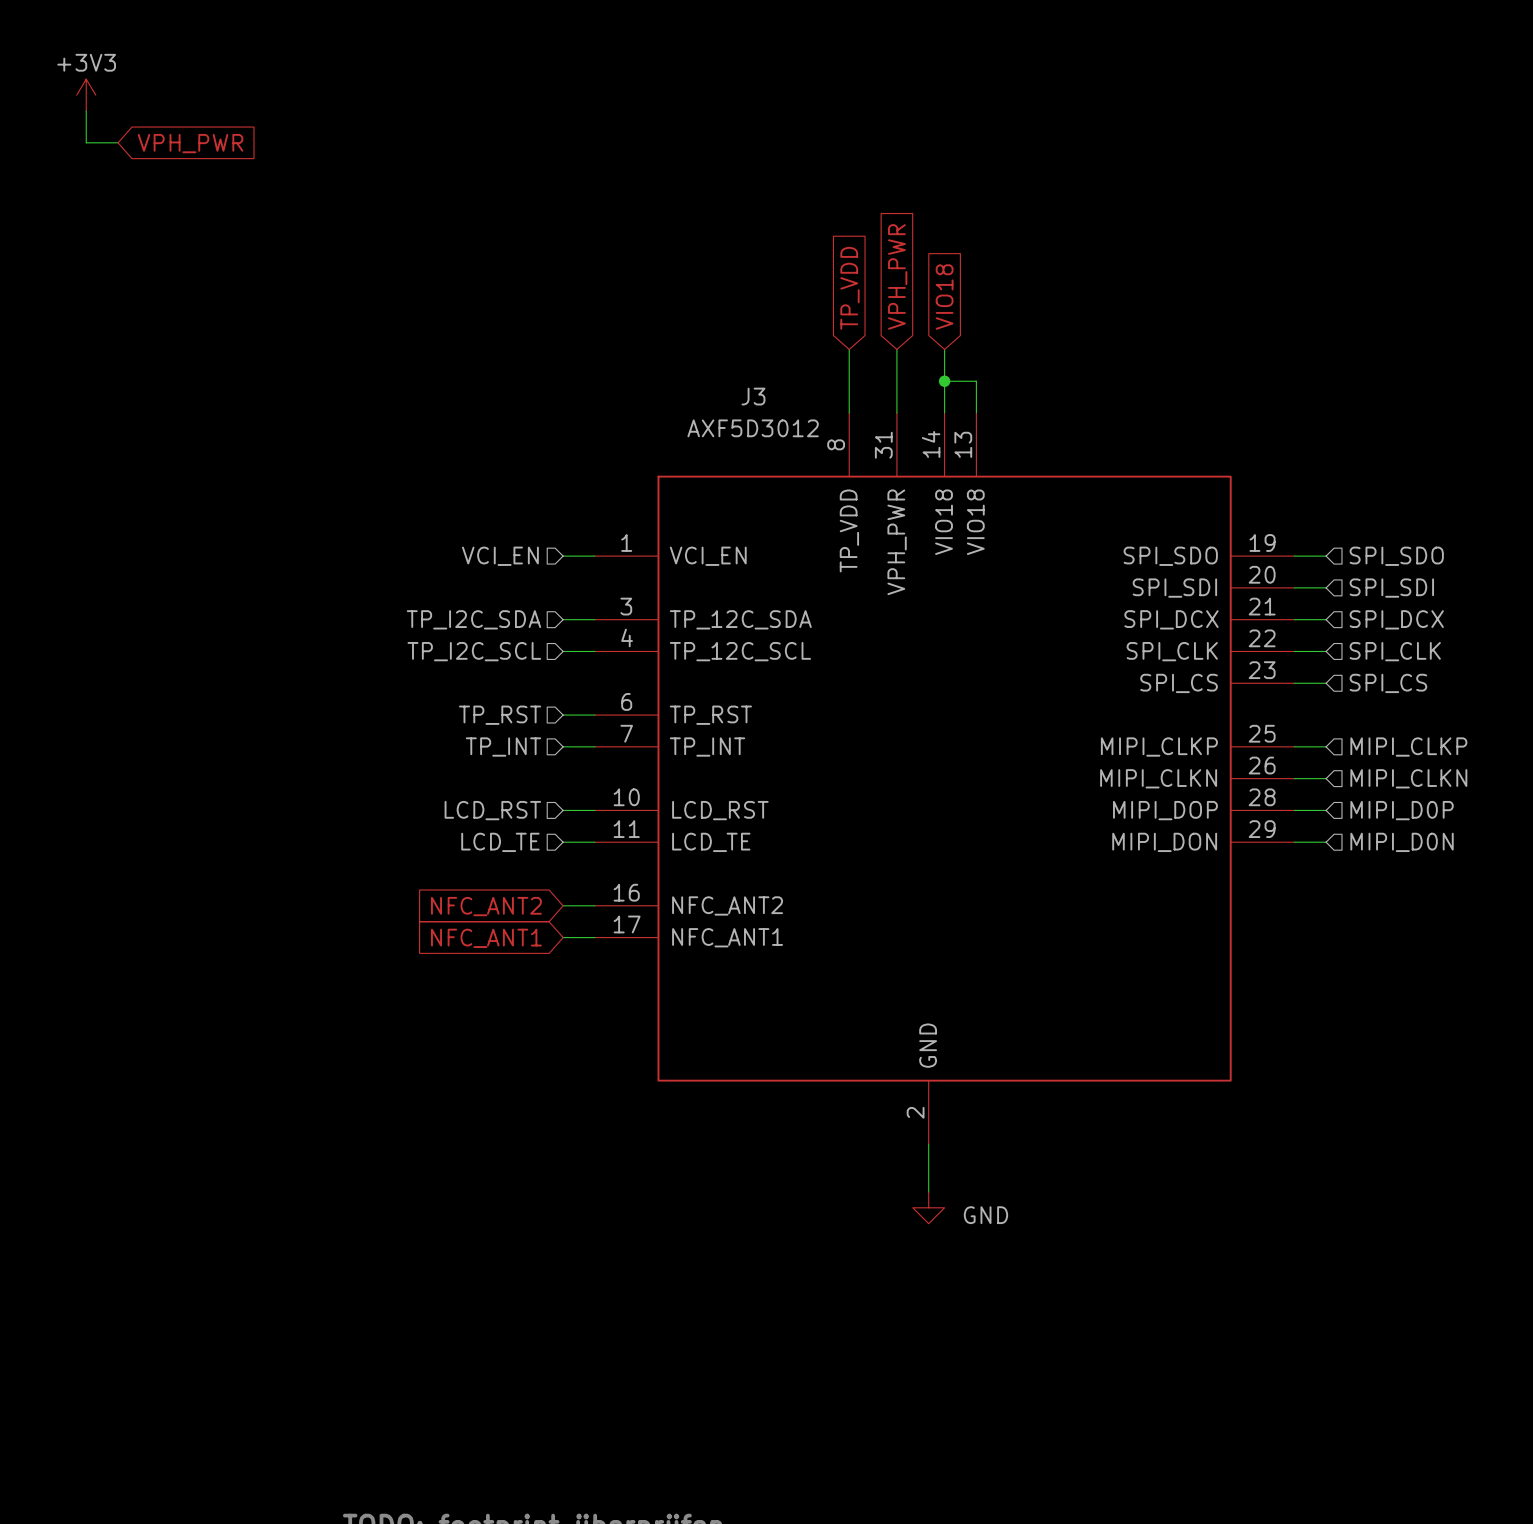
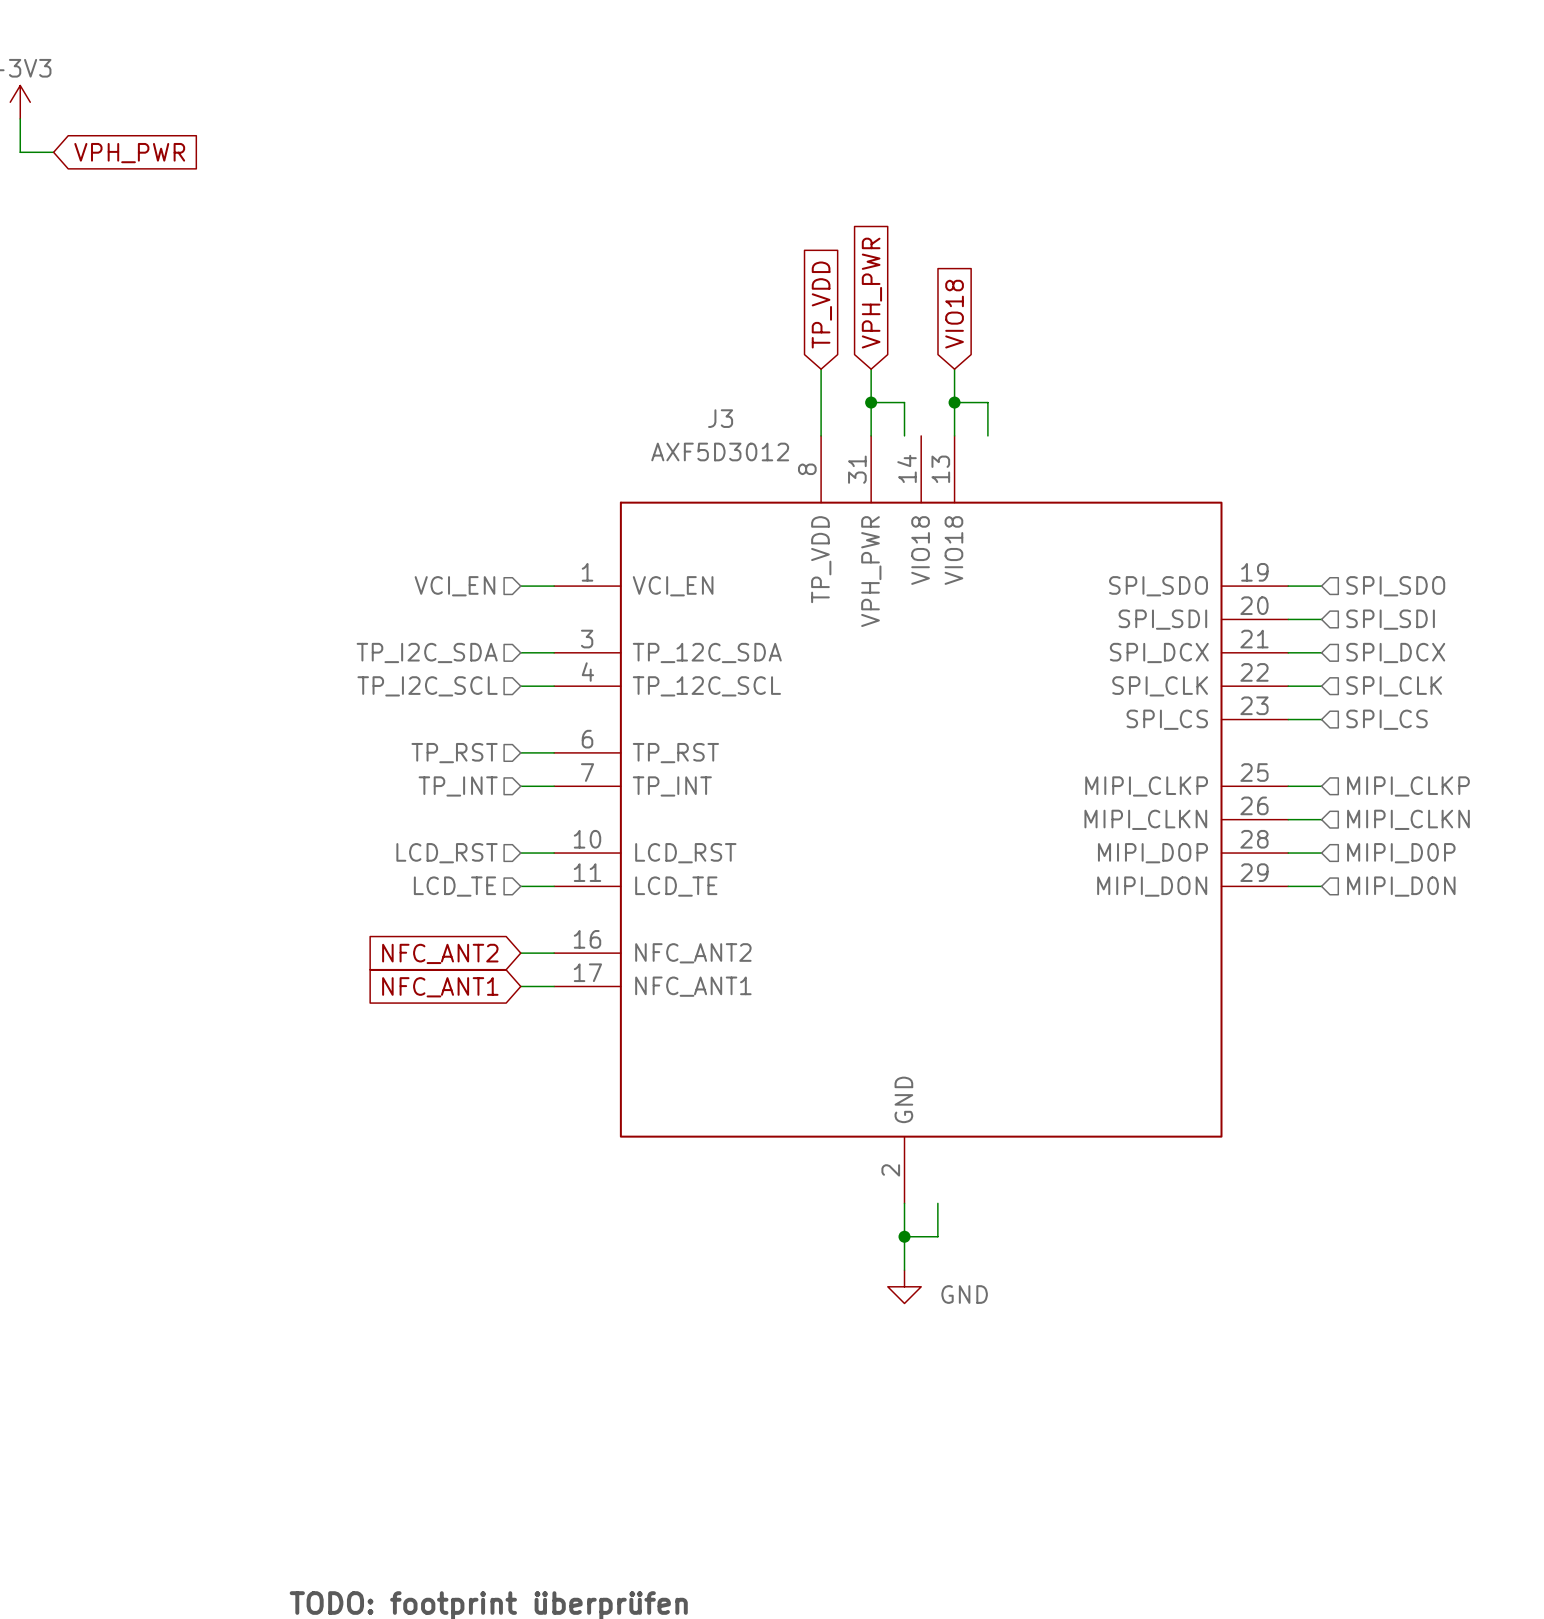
global label position: VIO18 (944, 297) -> VIO18 (954, 314)
wire: (944, 349) (944, 413) -> none
wire: none -> (954, 369) (954, 402) (987, 402) (987, 435)
wire: none -> (871, 402) (904, 402) (904, 435)
junction: none -> (871, 402)
wire: (944, 381) (976, 381) -> none
junction: (944, 381) -> none
junction: none -> (954, 402)
wire: none -> (937, 1203) (937, 1236) (904, 1236)
junction: none -> (904, 1236)
power symbol position: GND (928, 1207) -> GND (904, 1286)

